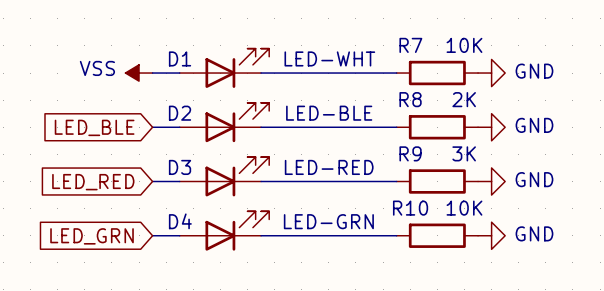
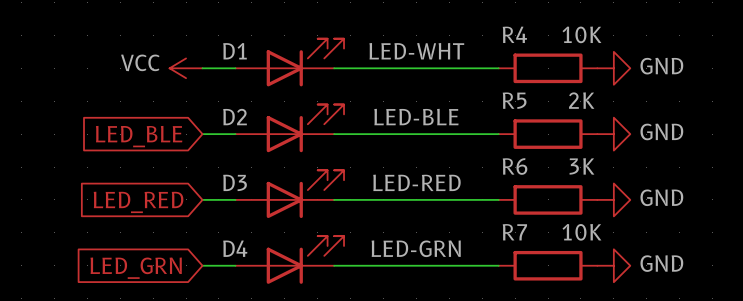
R7 name: R7 (410, 45) -> R4 (514, 34)
power symbol: VSS (139, 73) -> VCC (186, 68)
R8 name: R8 (410, 99) -> R5 (514, 100)
R9 name: R9 (410, 153) -> R6 (515, 166)
R10 name: R10 (410, 208) -> R7 (514, 232)

